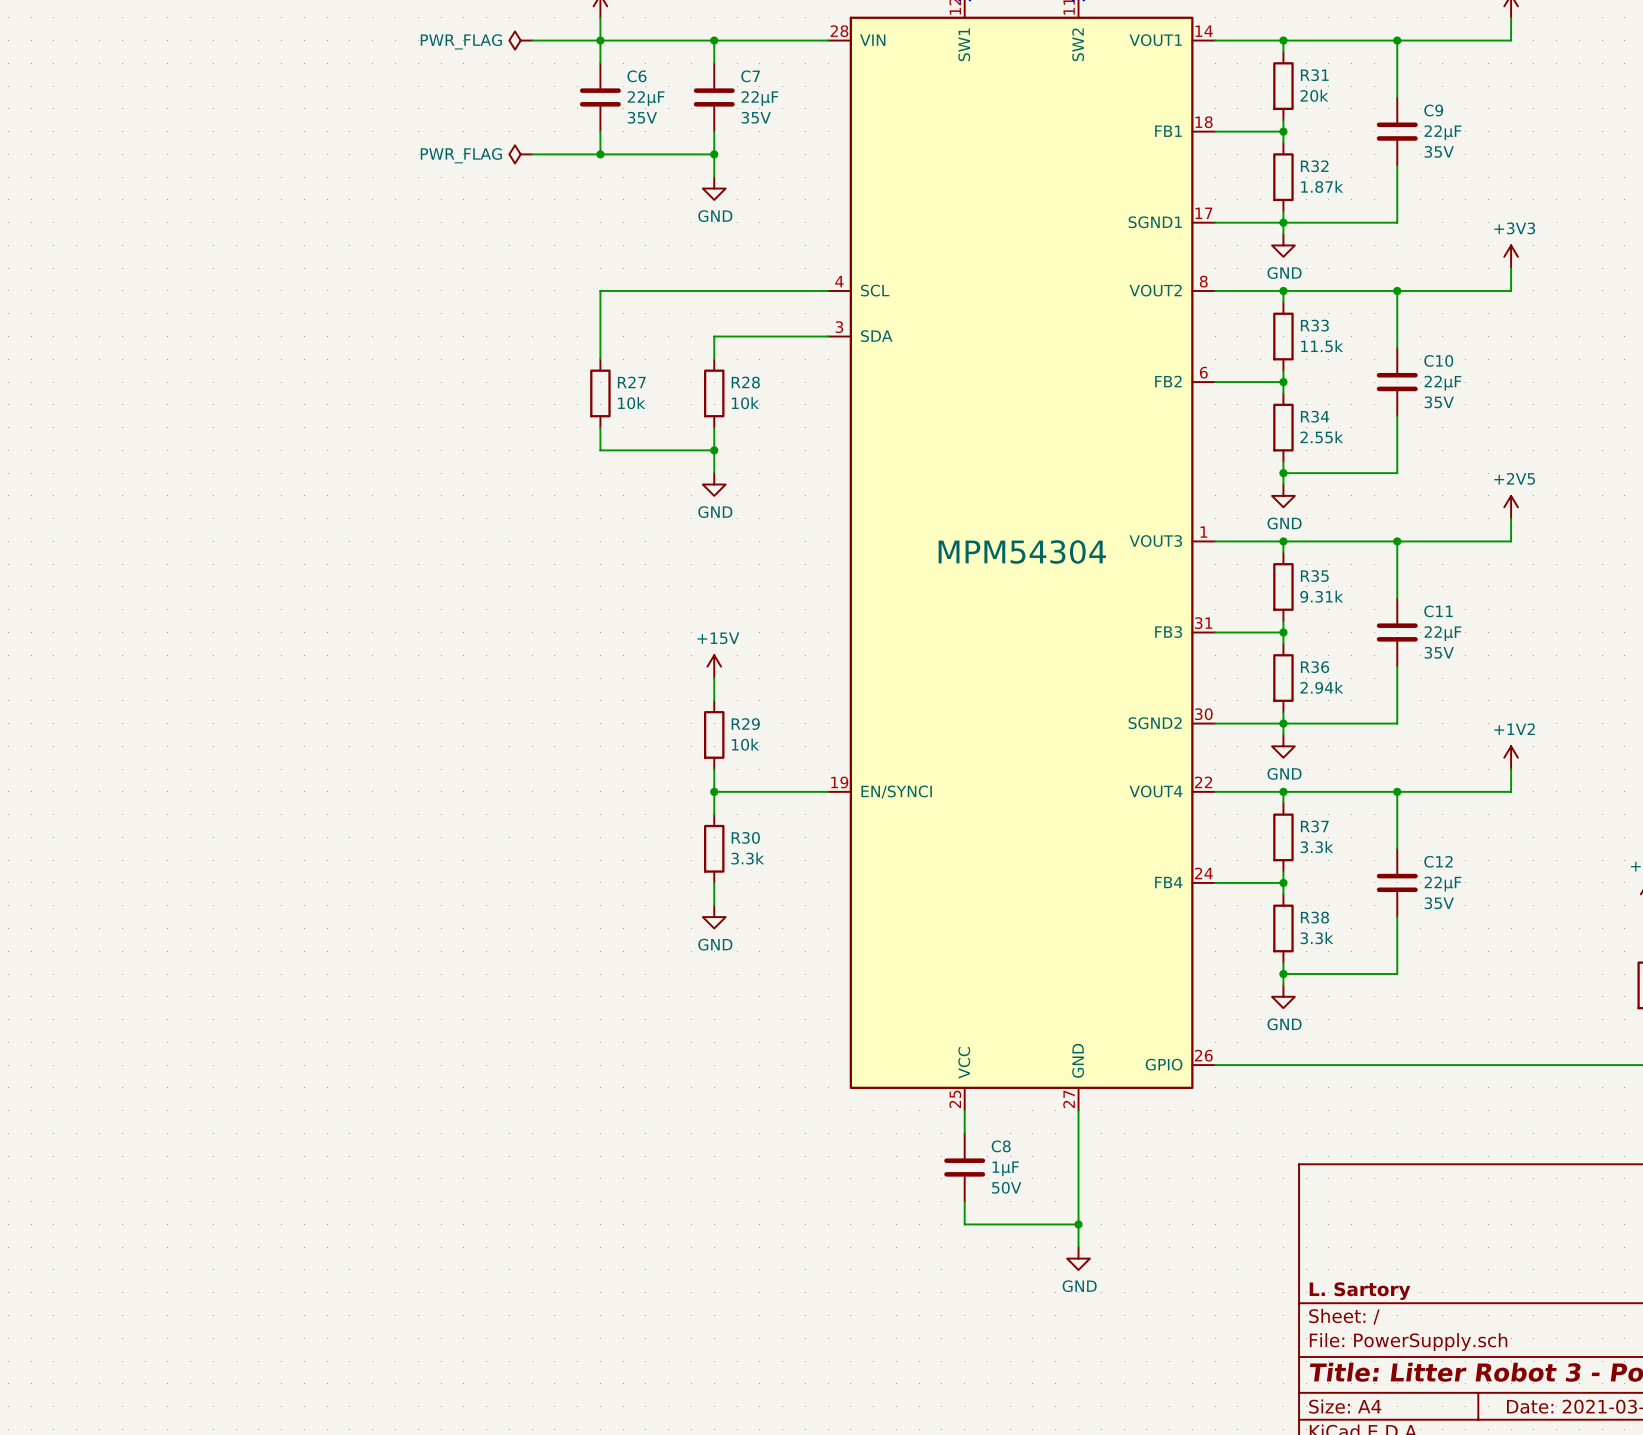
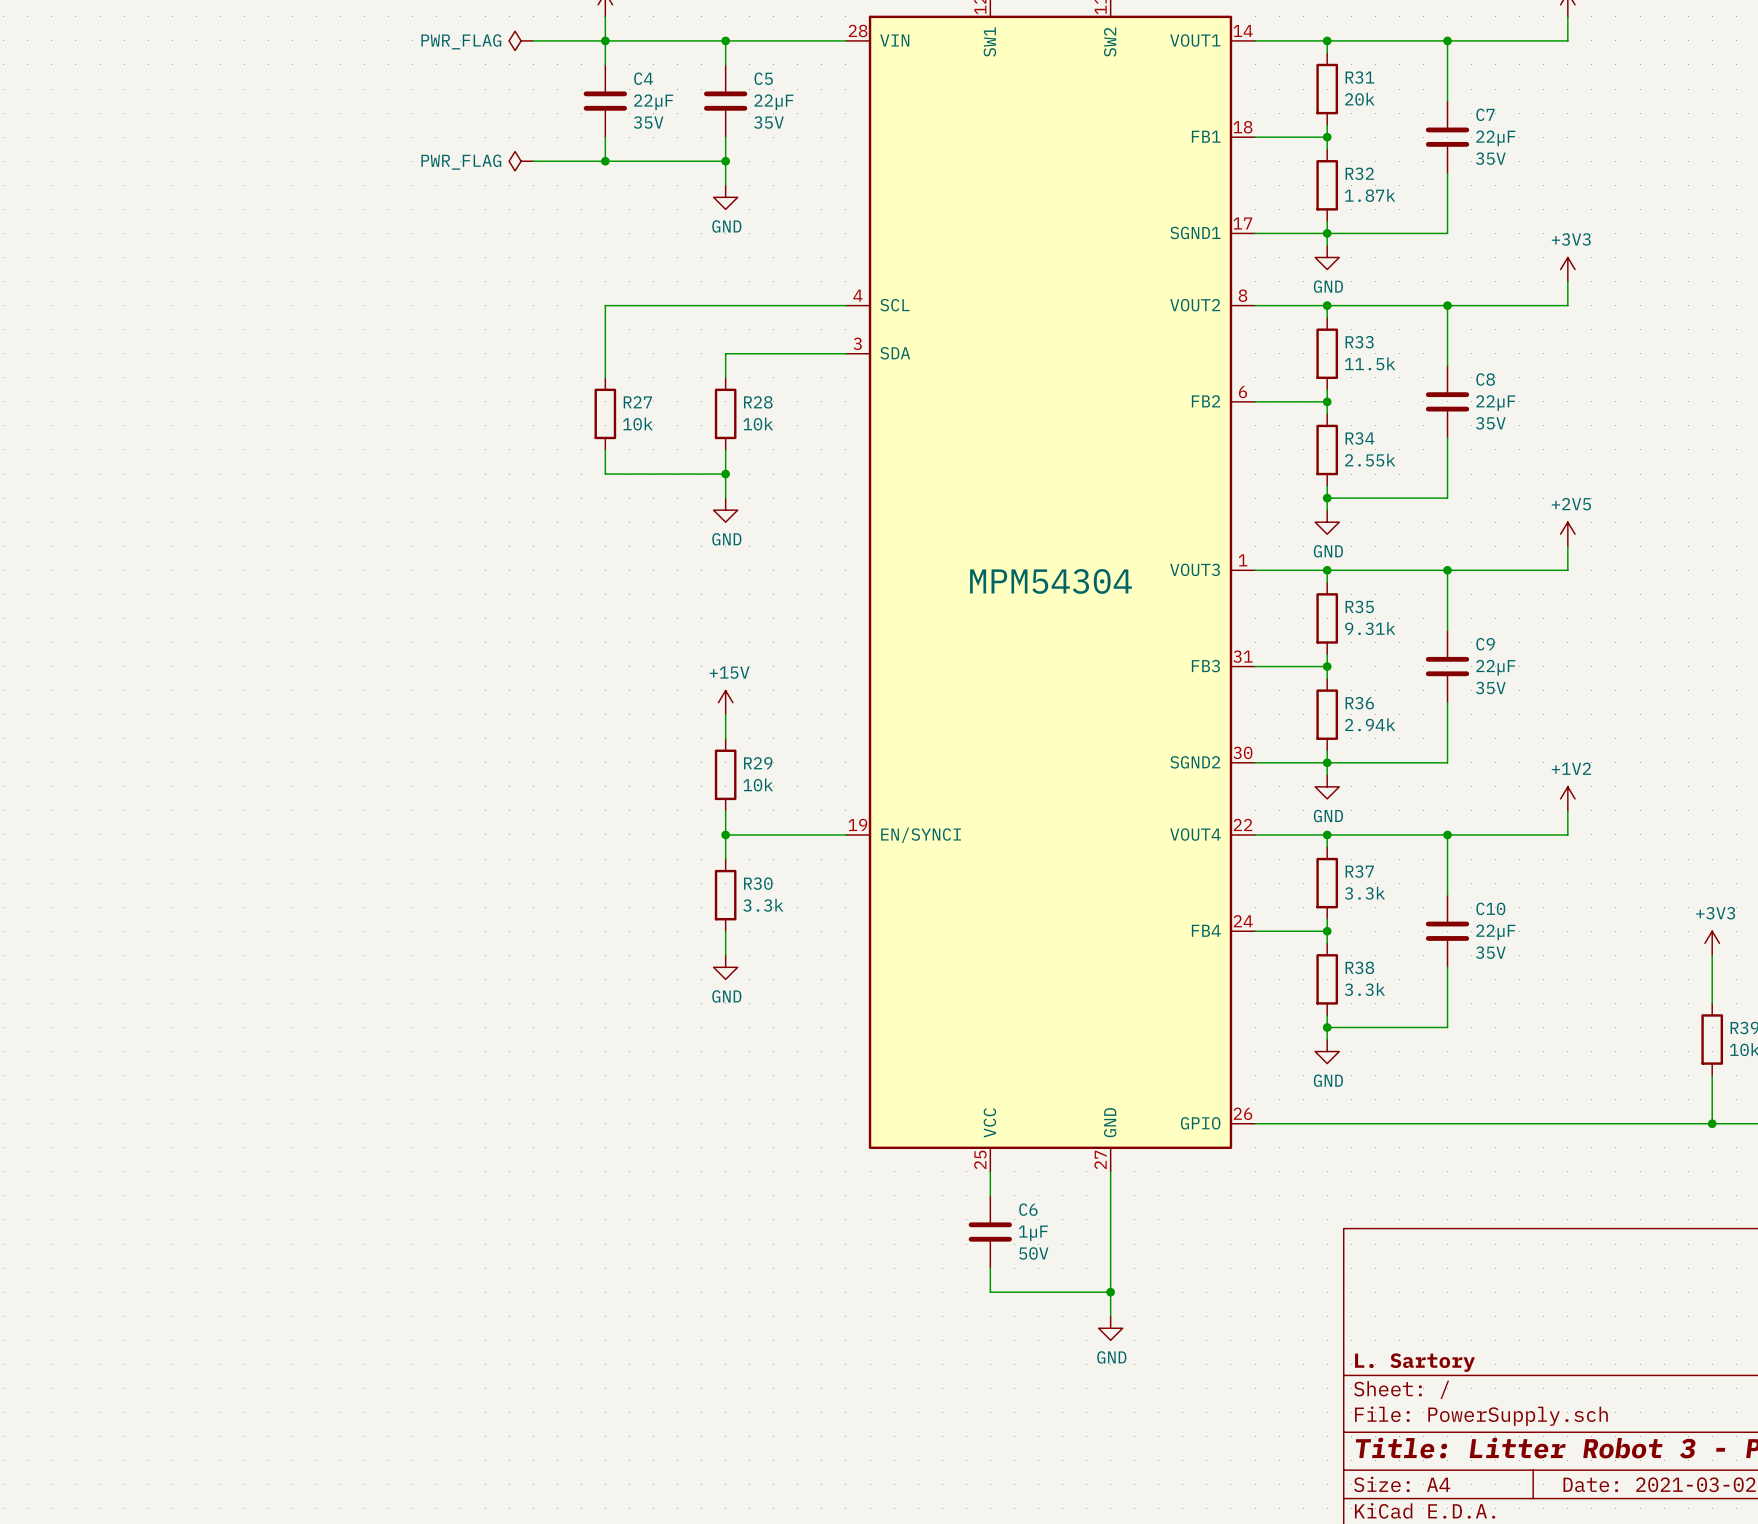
C6 name: C6 (636, 76) -> C4 (643, 78)
C7 name: C7 (750, 76) -> C5 (763, 78)
C9 name: C9 (1433, 110) -> C7 (1485, 114)
C10 name: C10 (1438, 360) -> C8 (1485, 379)
C11 name: C11 (1438, 611) -> C9 (1485, 644)
C12 name: C12 (1438, 861) -> C10 (1490, 908)
C8 name: C8 (1001, 1146) -> C6 (1028, 1209)

